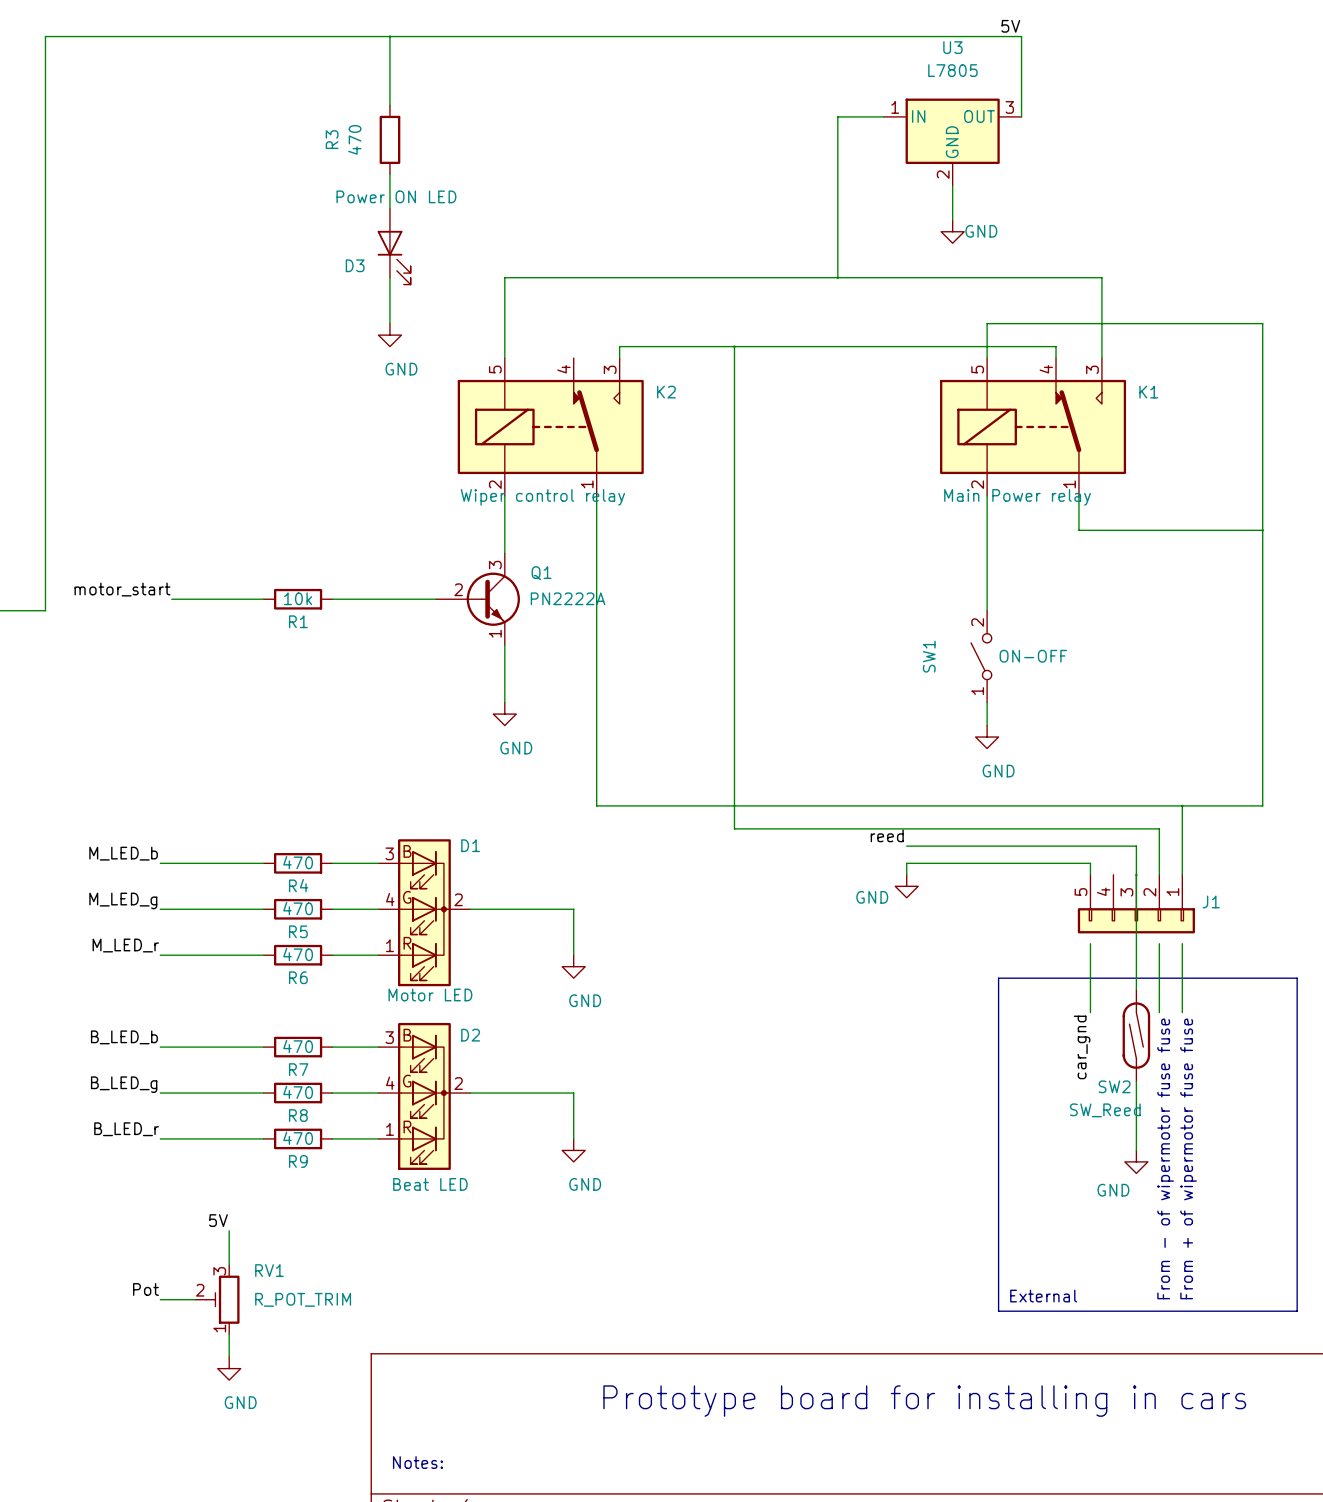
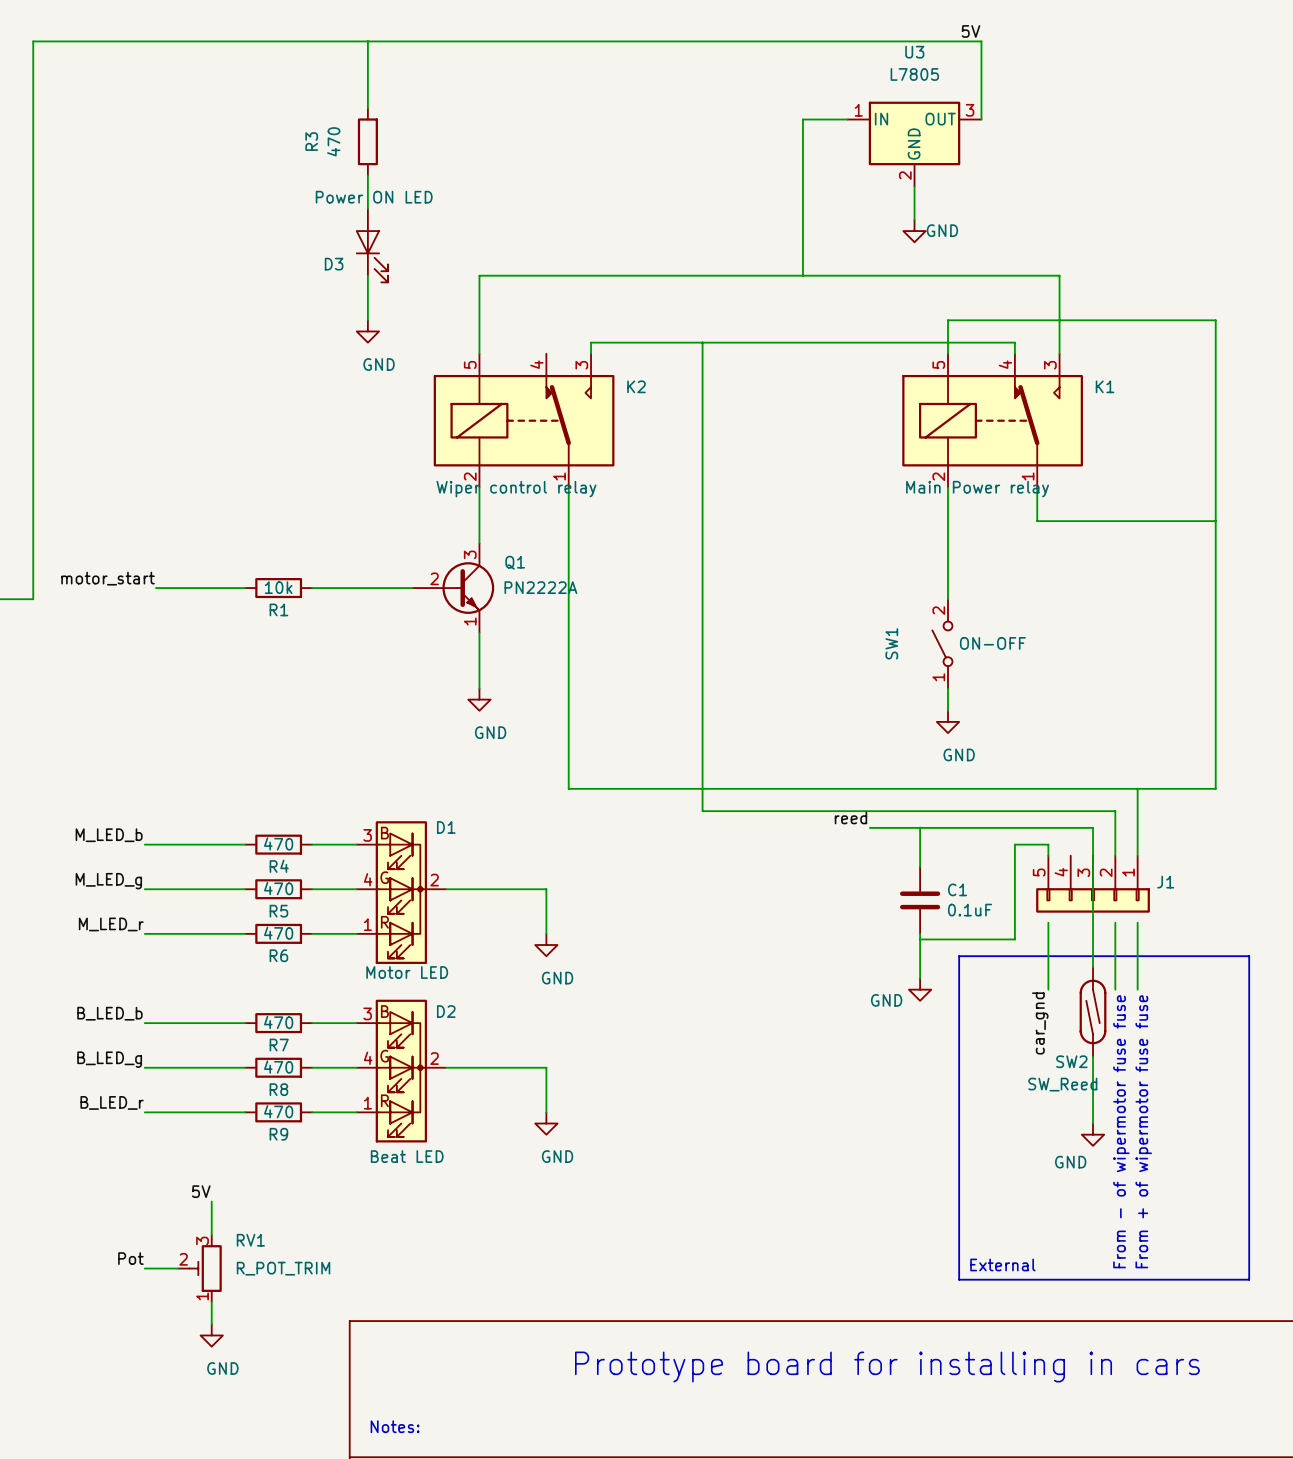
wire: none -> (920, 827) (920, 866)
wire: (1056, 863) (906, 863) (906, 874) -> (1014, 844) (1014, 939) (920, 939)
power symbol position: GND (906, 886) -> GND (920, 989)
C1: none -> 0.1uF (920, 900)
wire: none -> (920, 933) (920, 978)

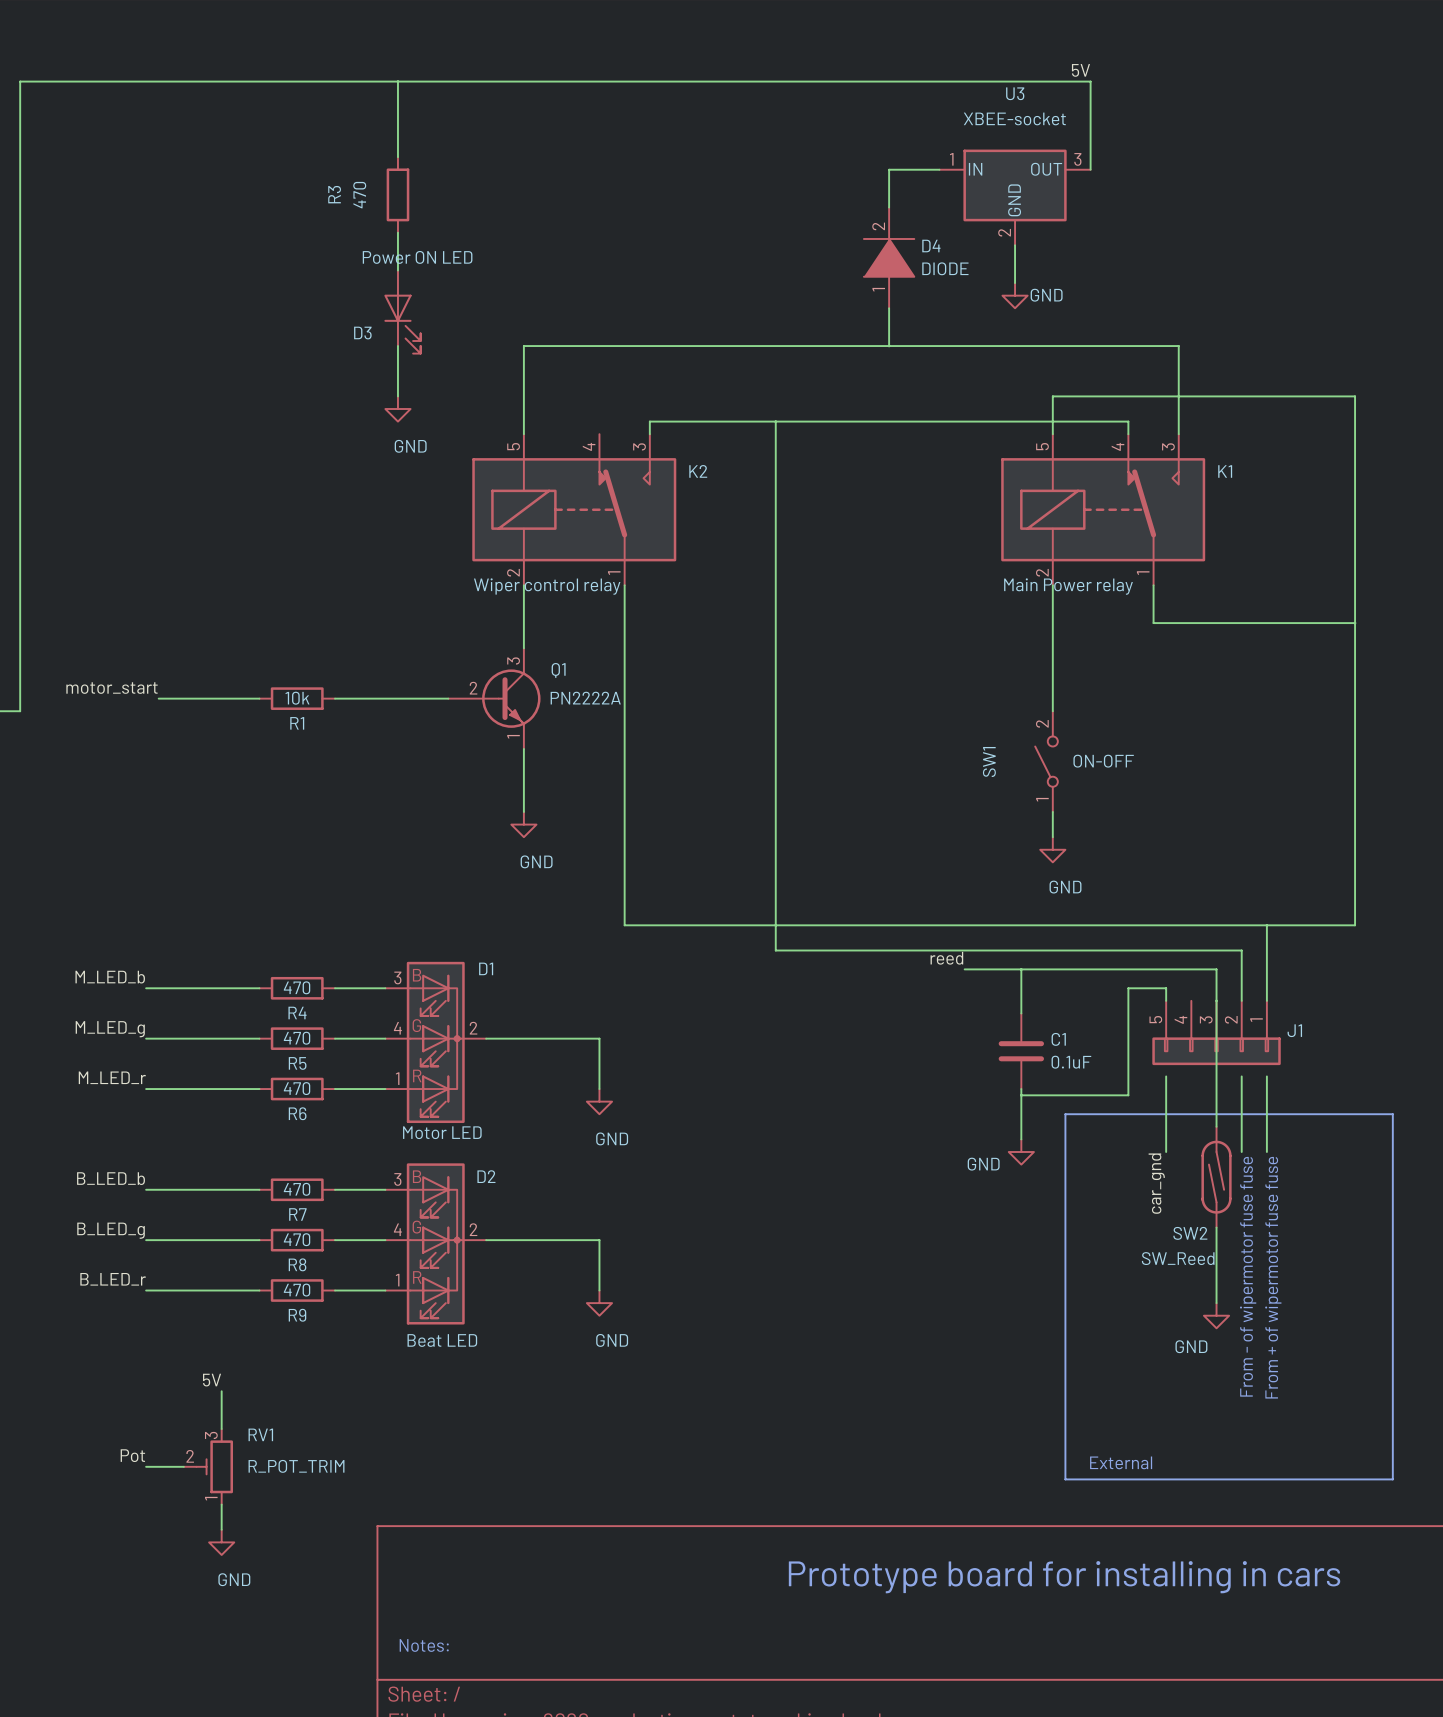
U3 value: L7805 (914, 74) -> XBEE-socket (1014, 118)
D4: none -> DIODE (889, 257)

